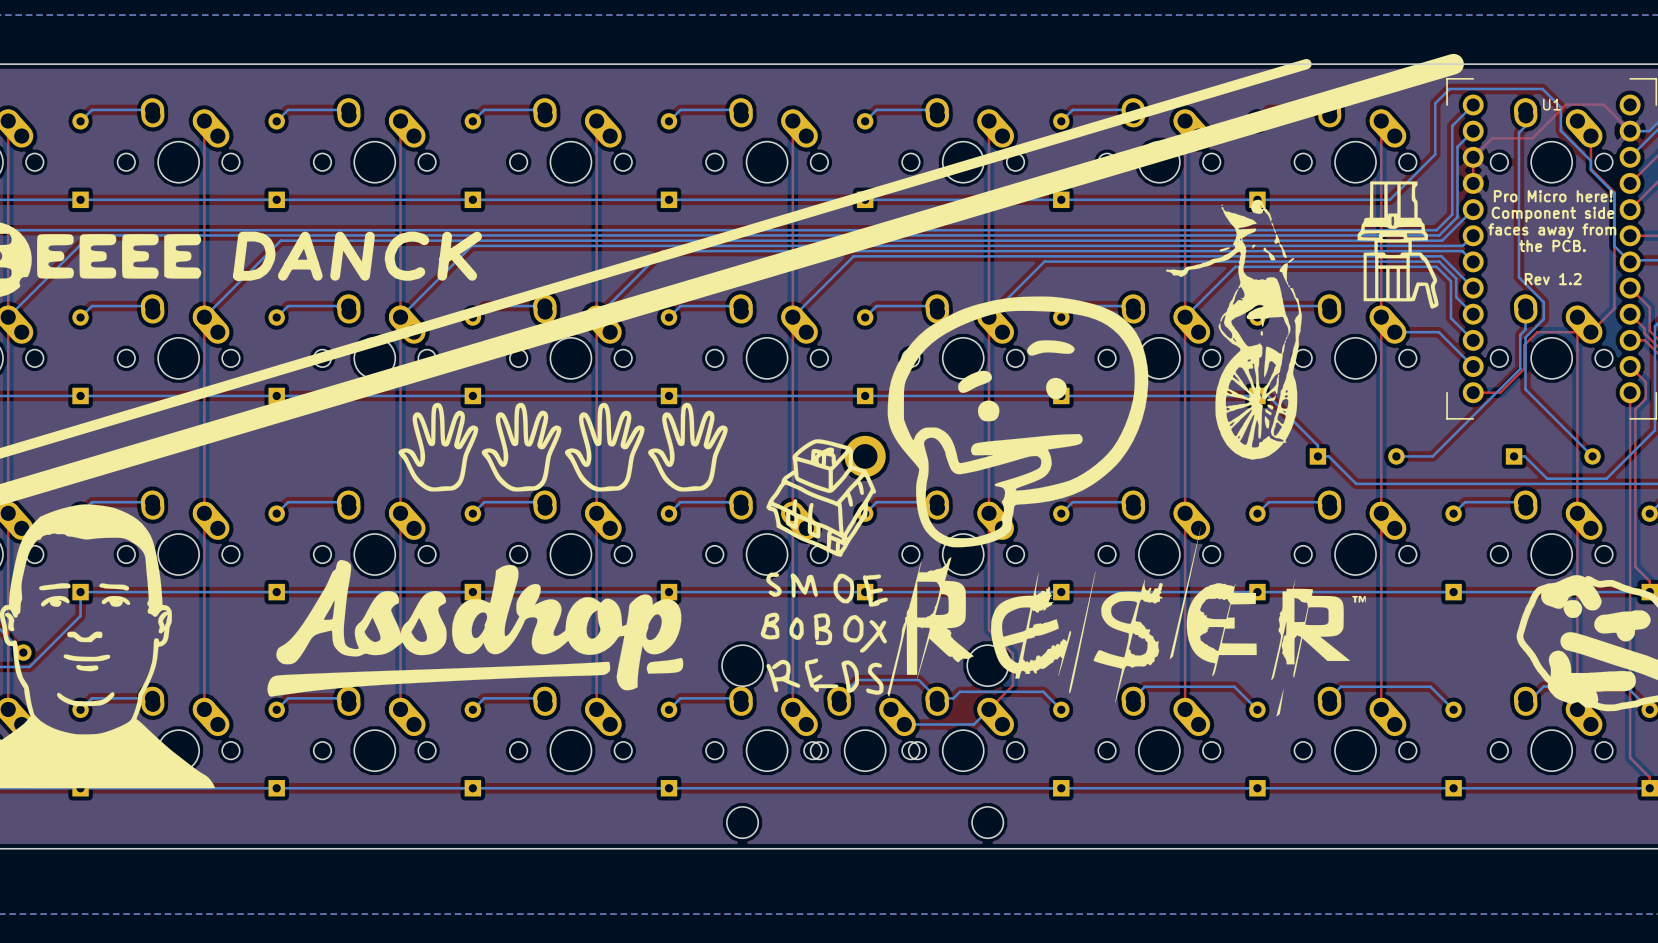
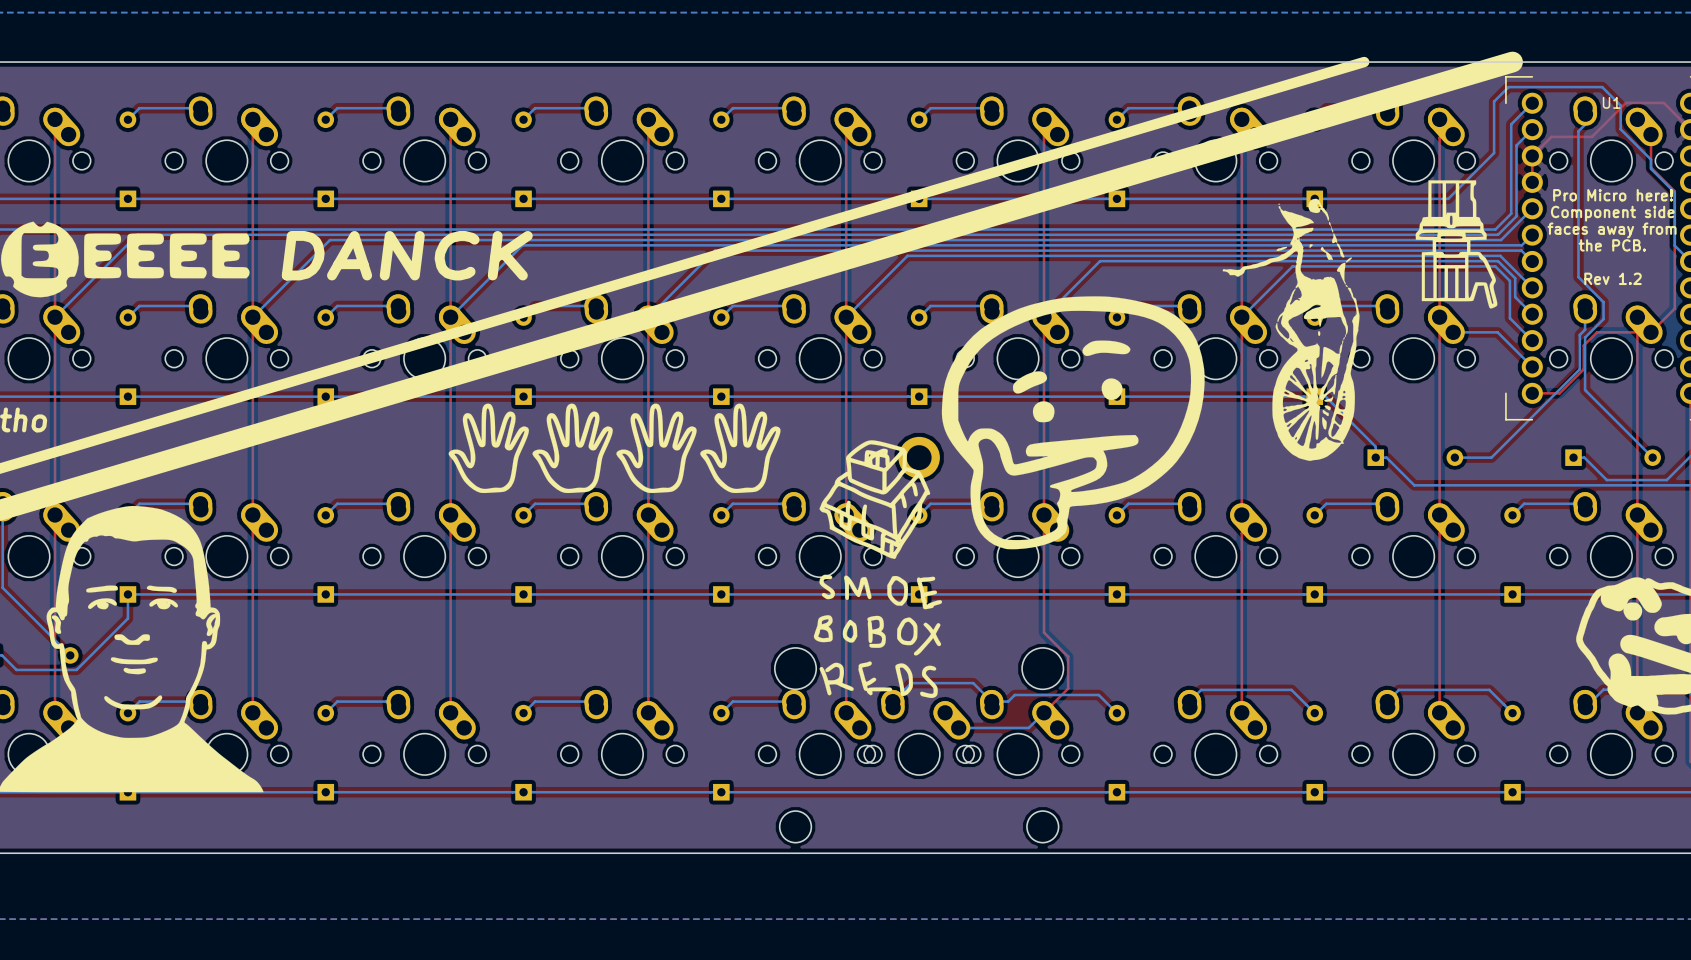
drawing: [887, 527, 1366, 717] -> none
drawing: [267, 559, 684, 697] -> none

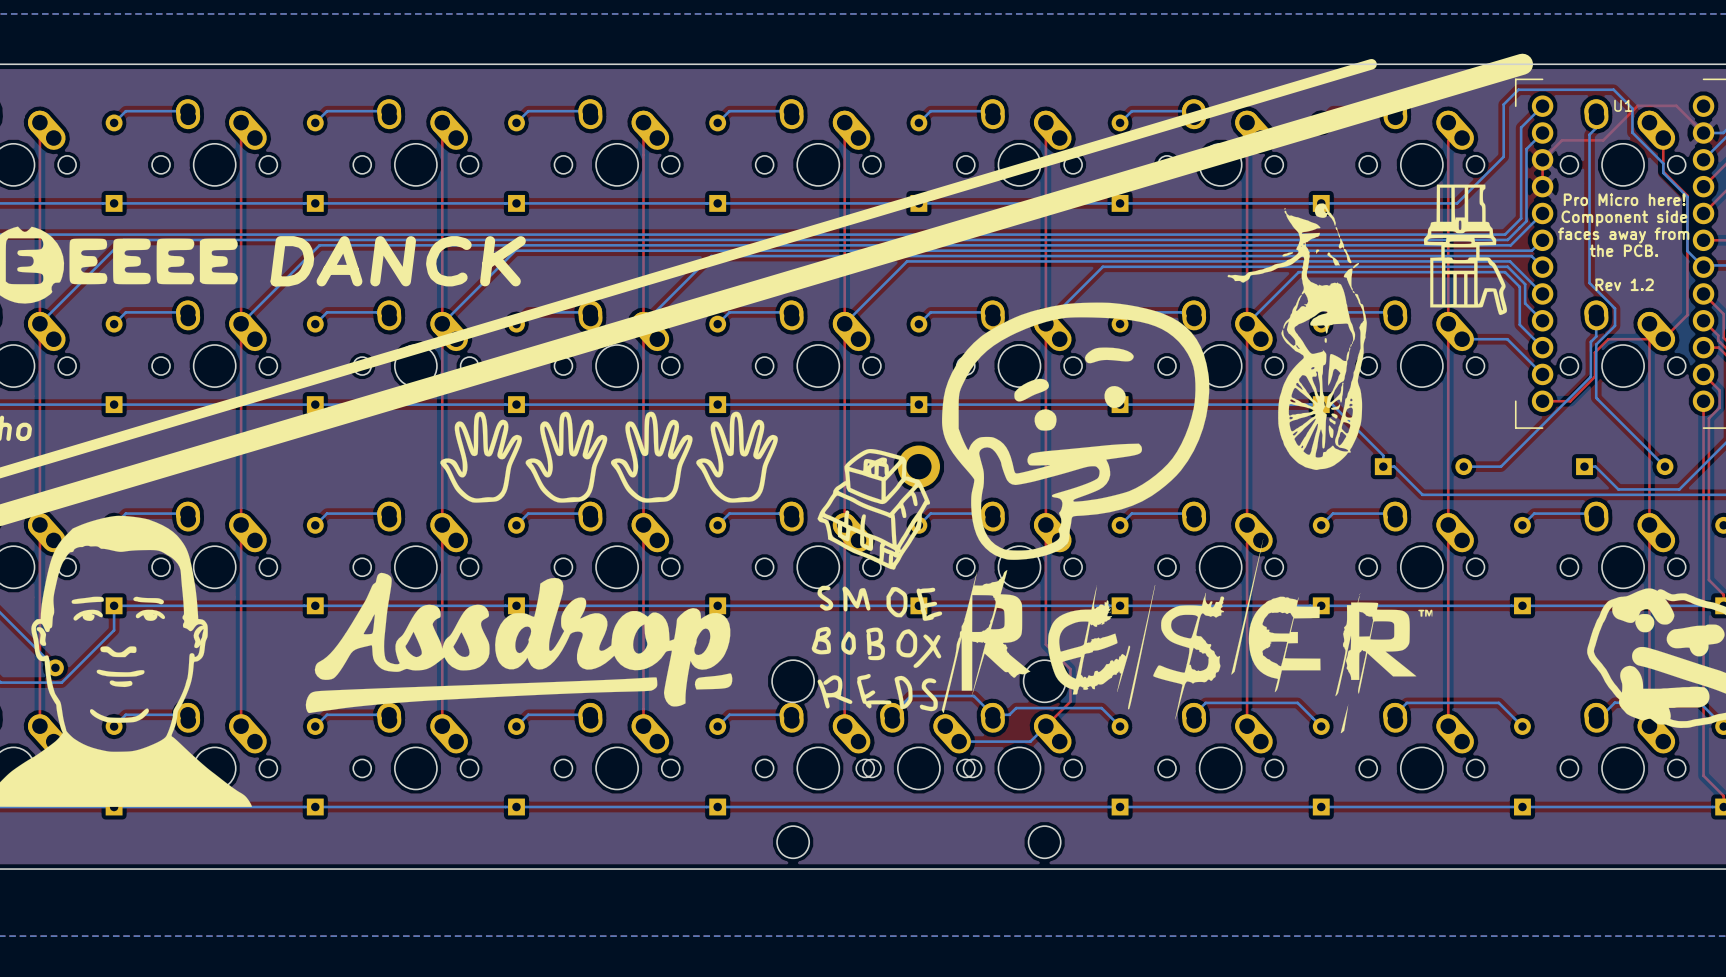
drawing: none -> [941, 539, 1433, 734]
drawing: none -> [305, 572, 733, 714]

